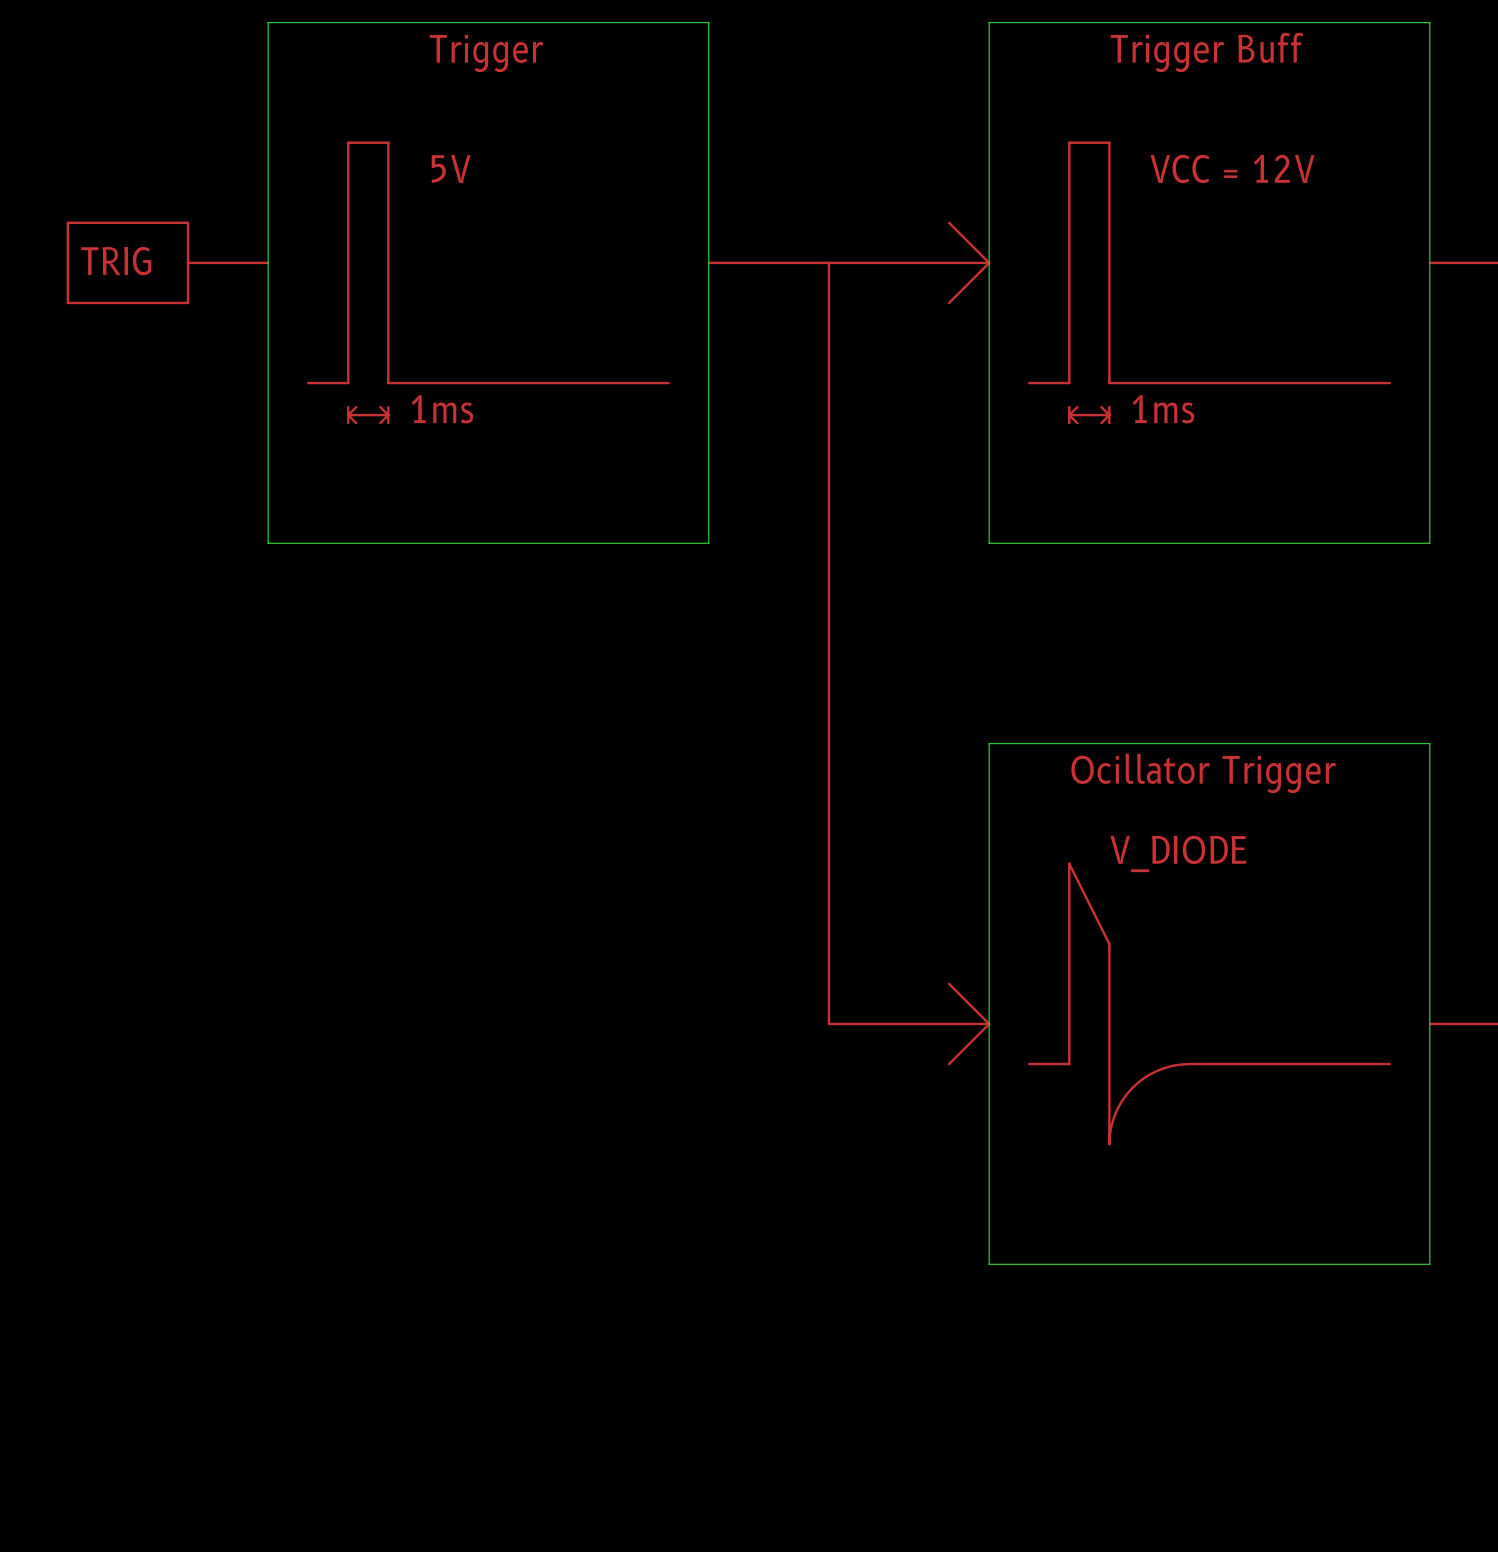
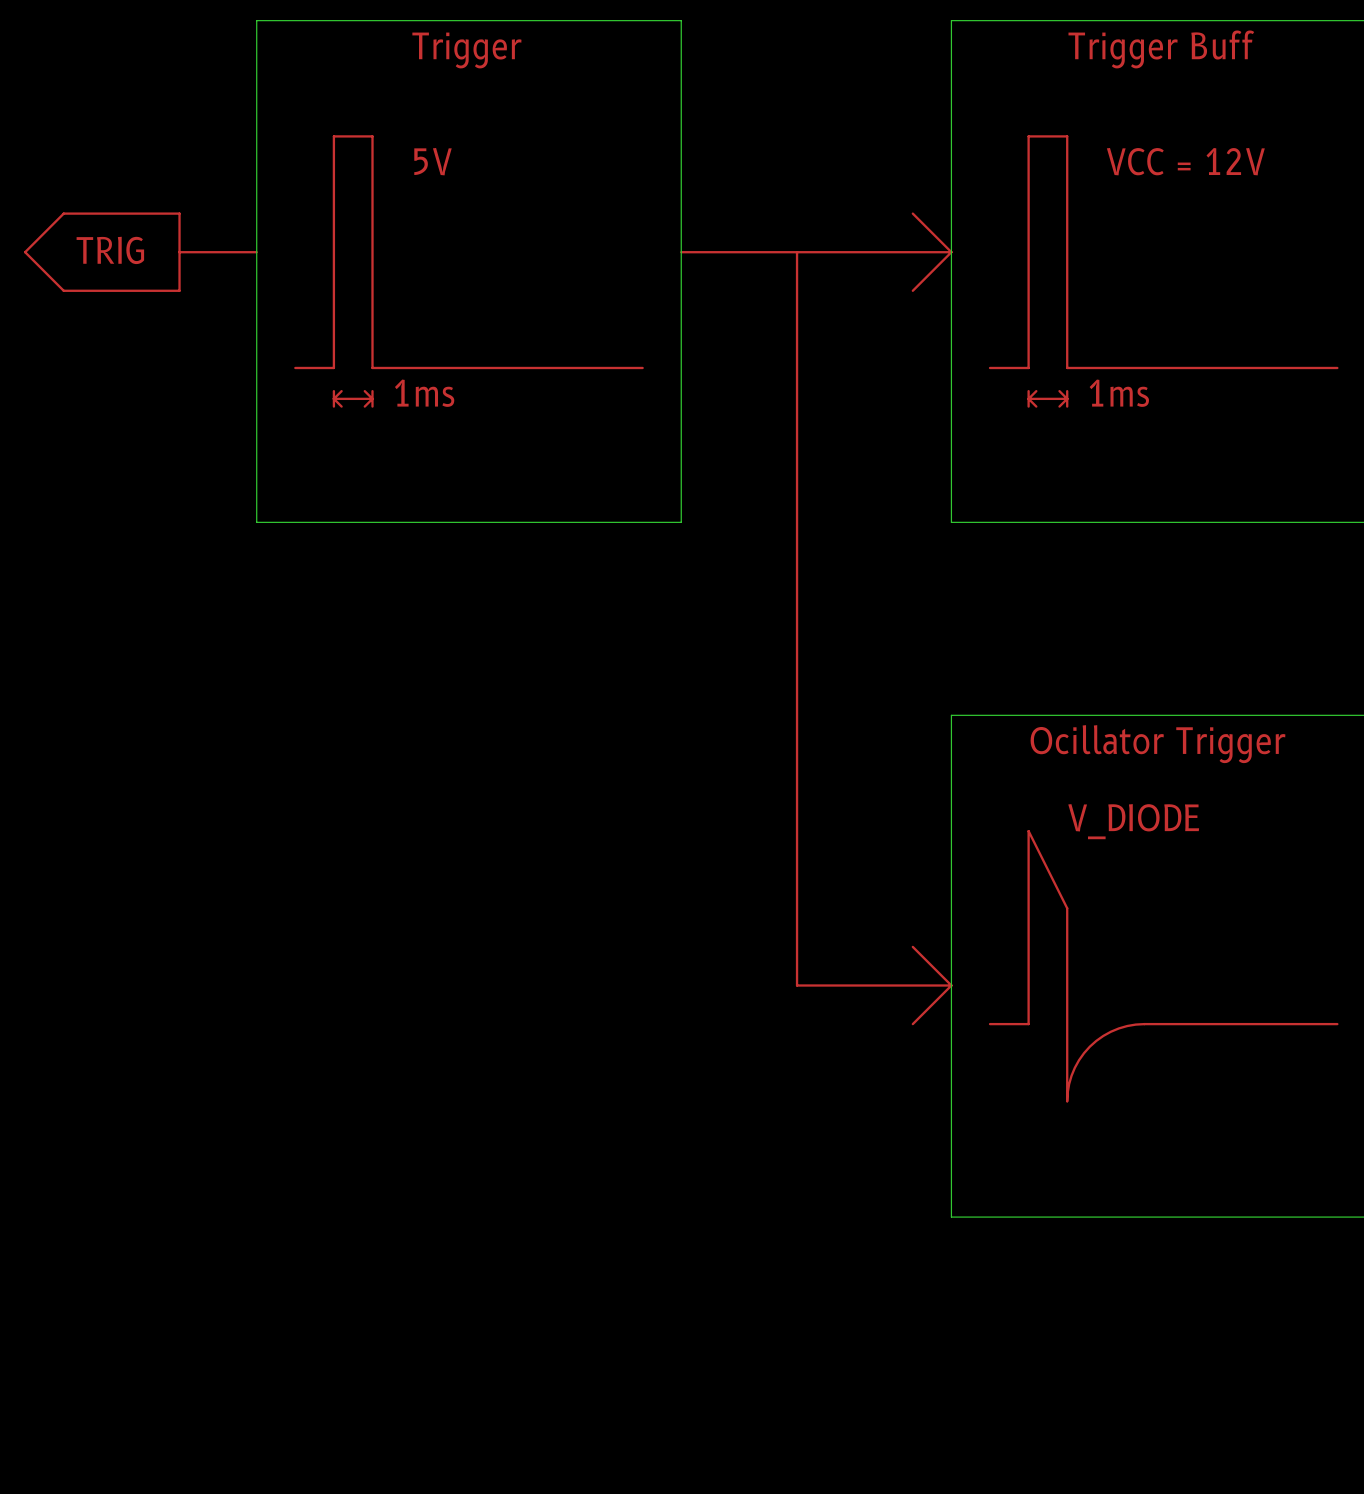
line: (67, 222) (67, 302) -> (63, 213) (25, 252) (63, 290)

